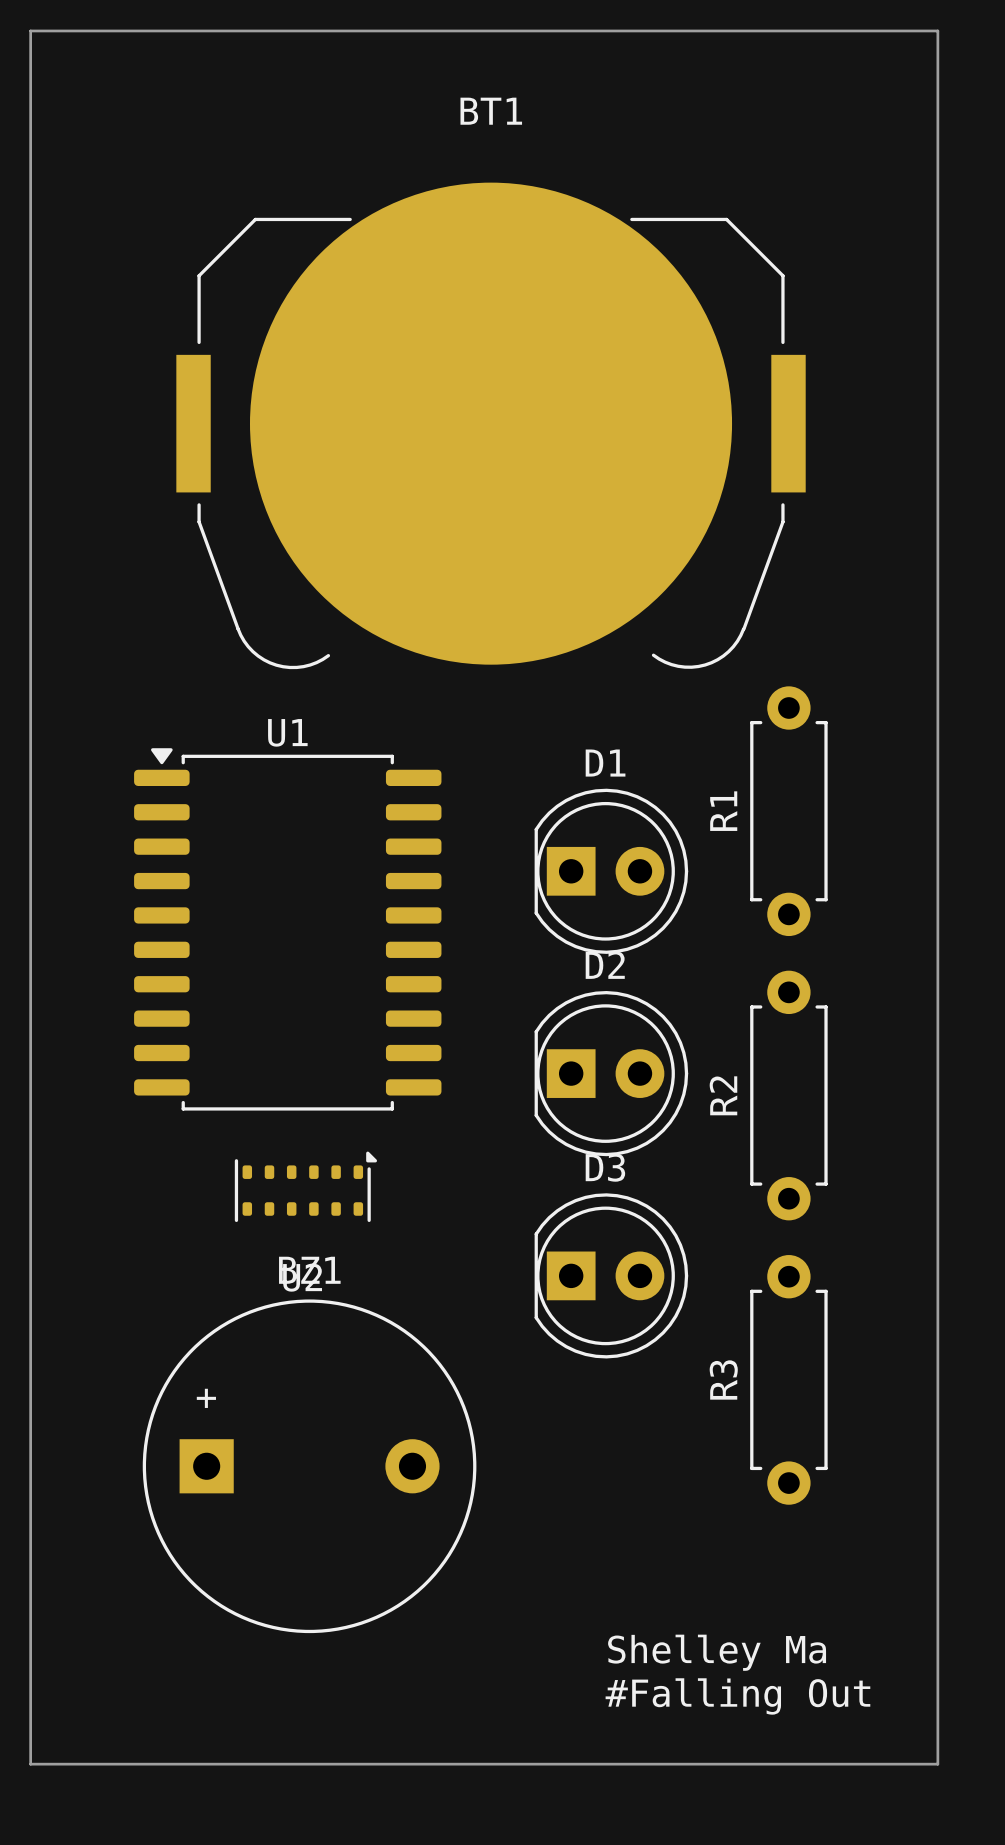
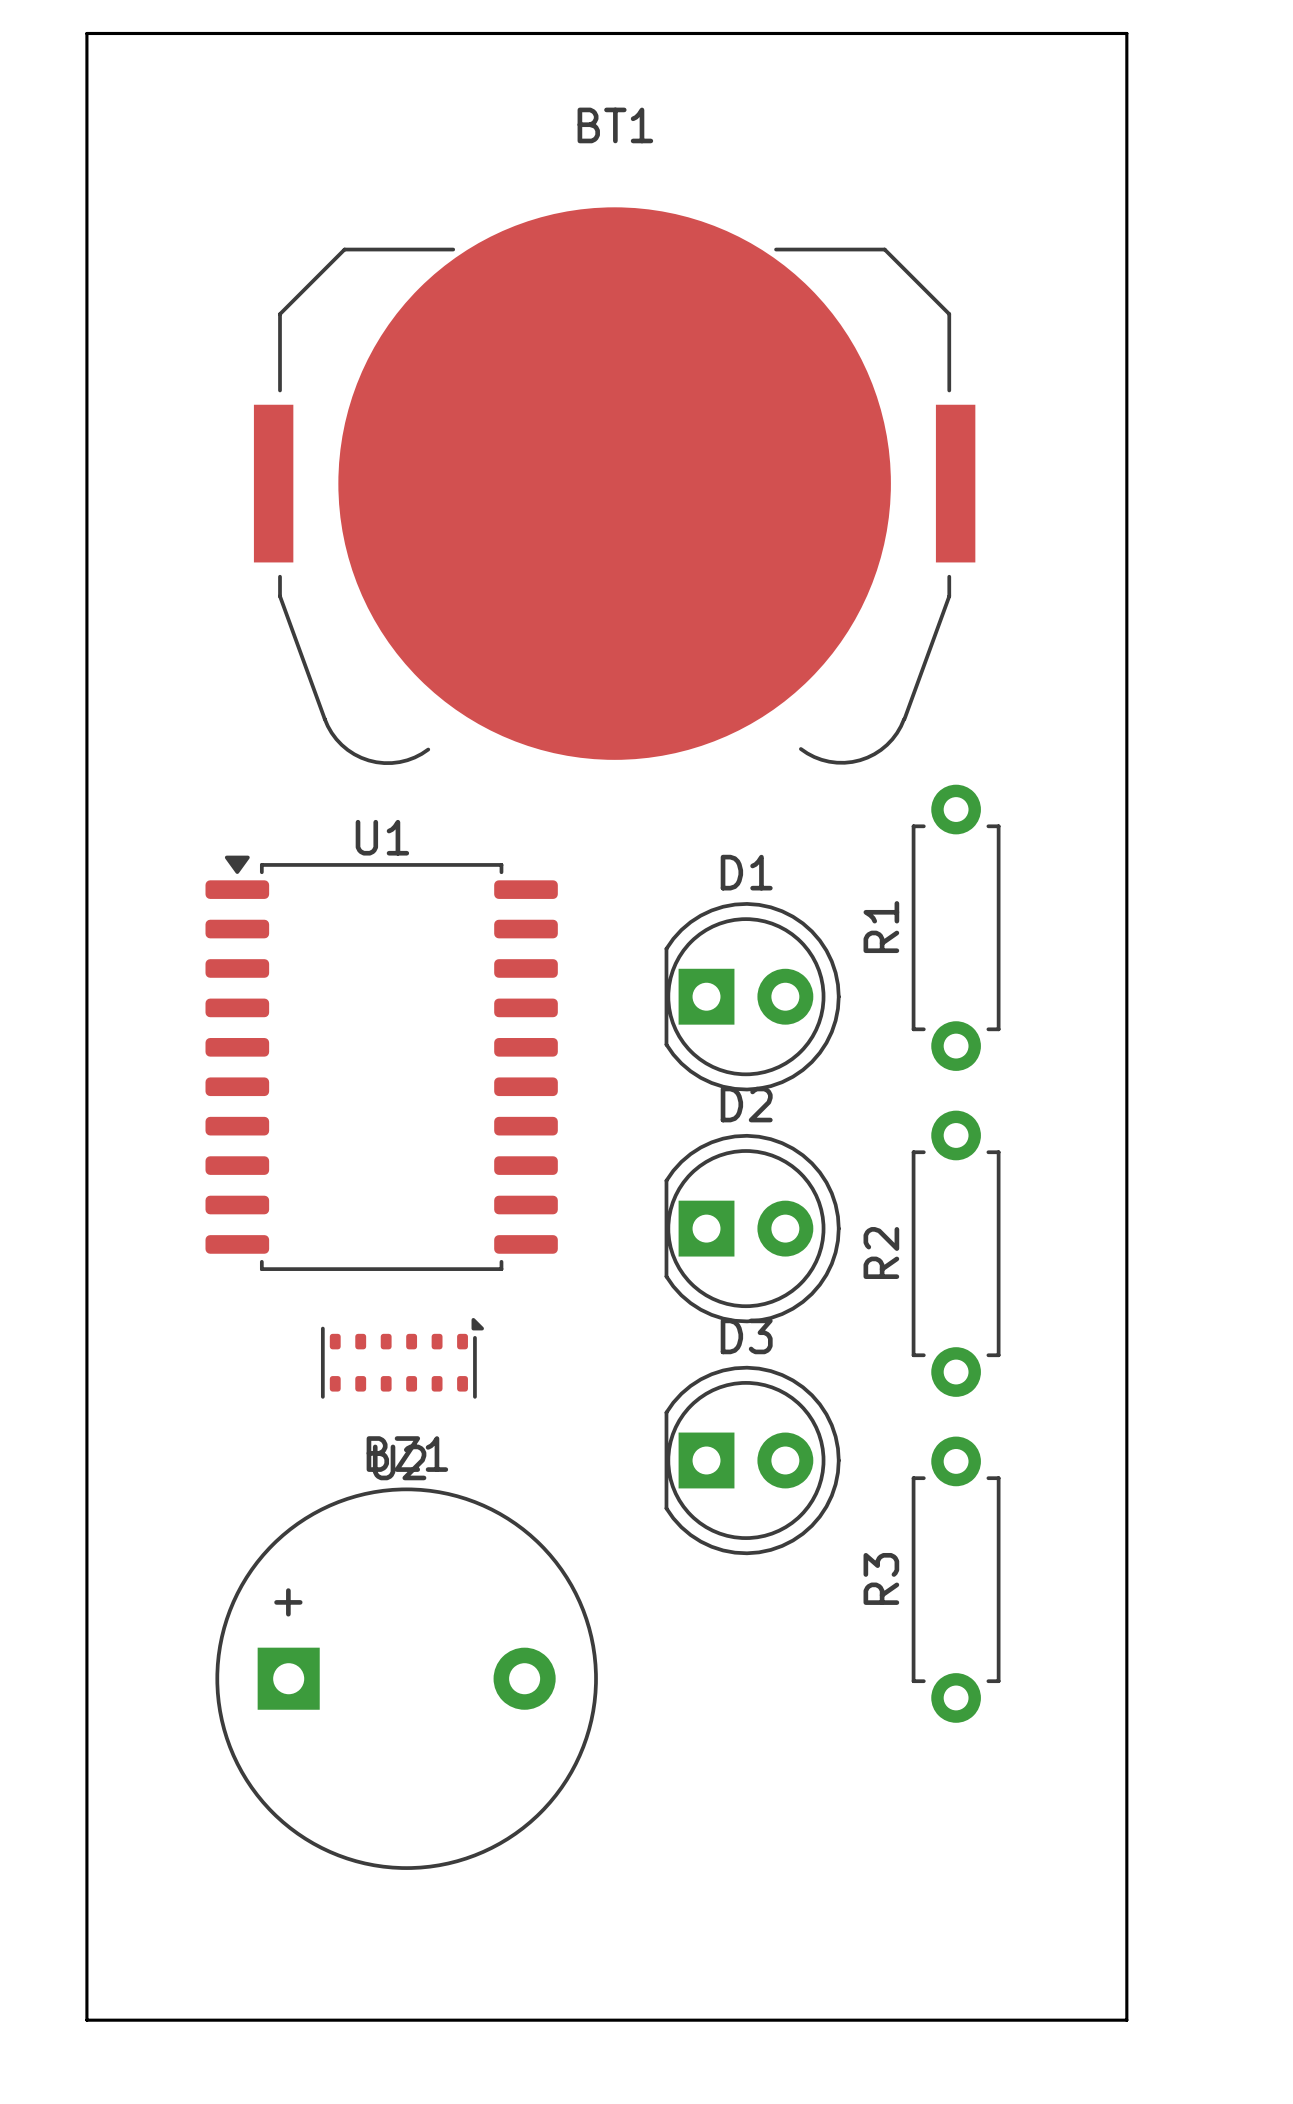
text: Shelley Ma (717, 1652) -> none
text: #Falling Out (737, 1696) -> none

